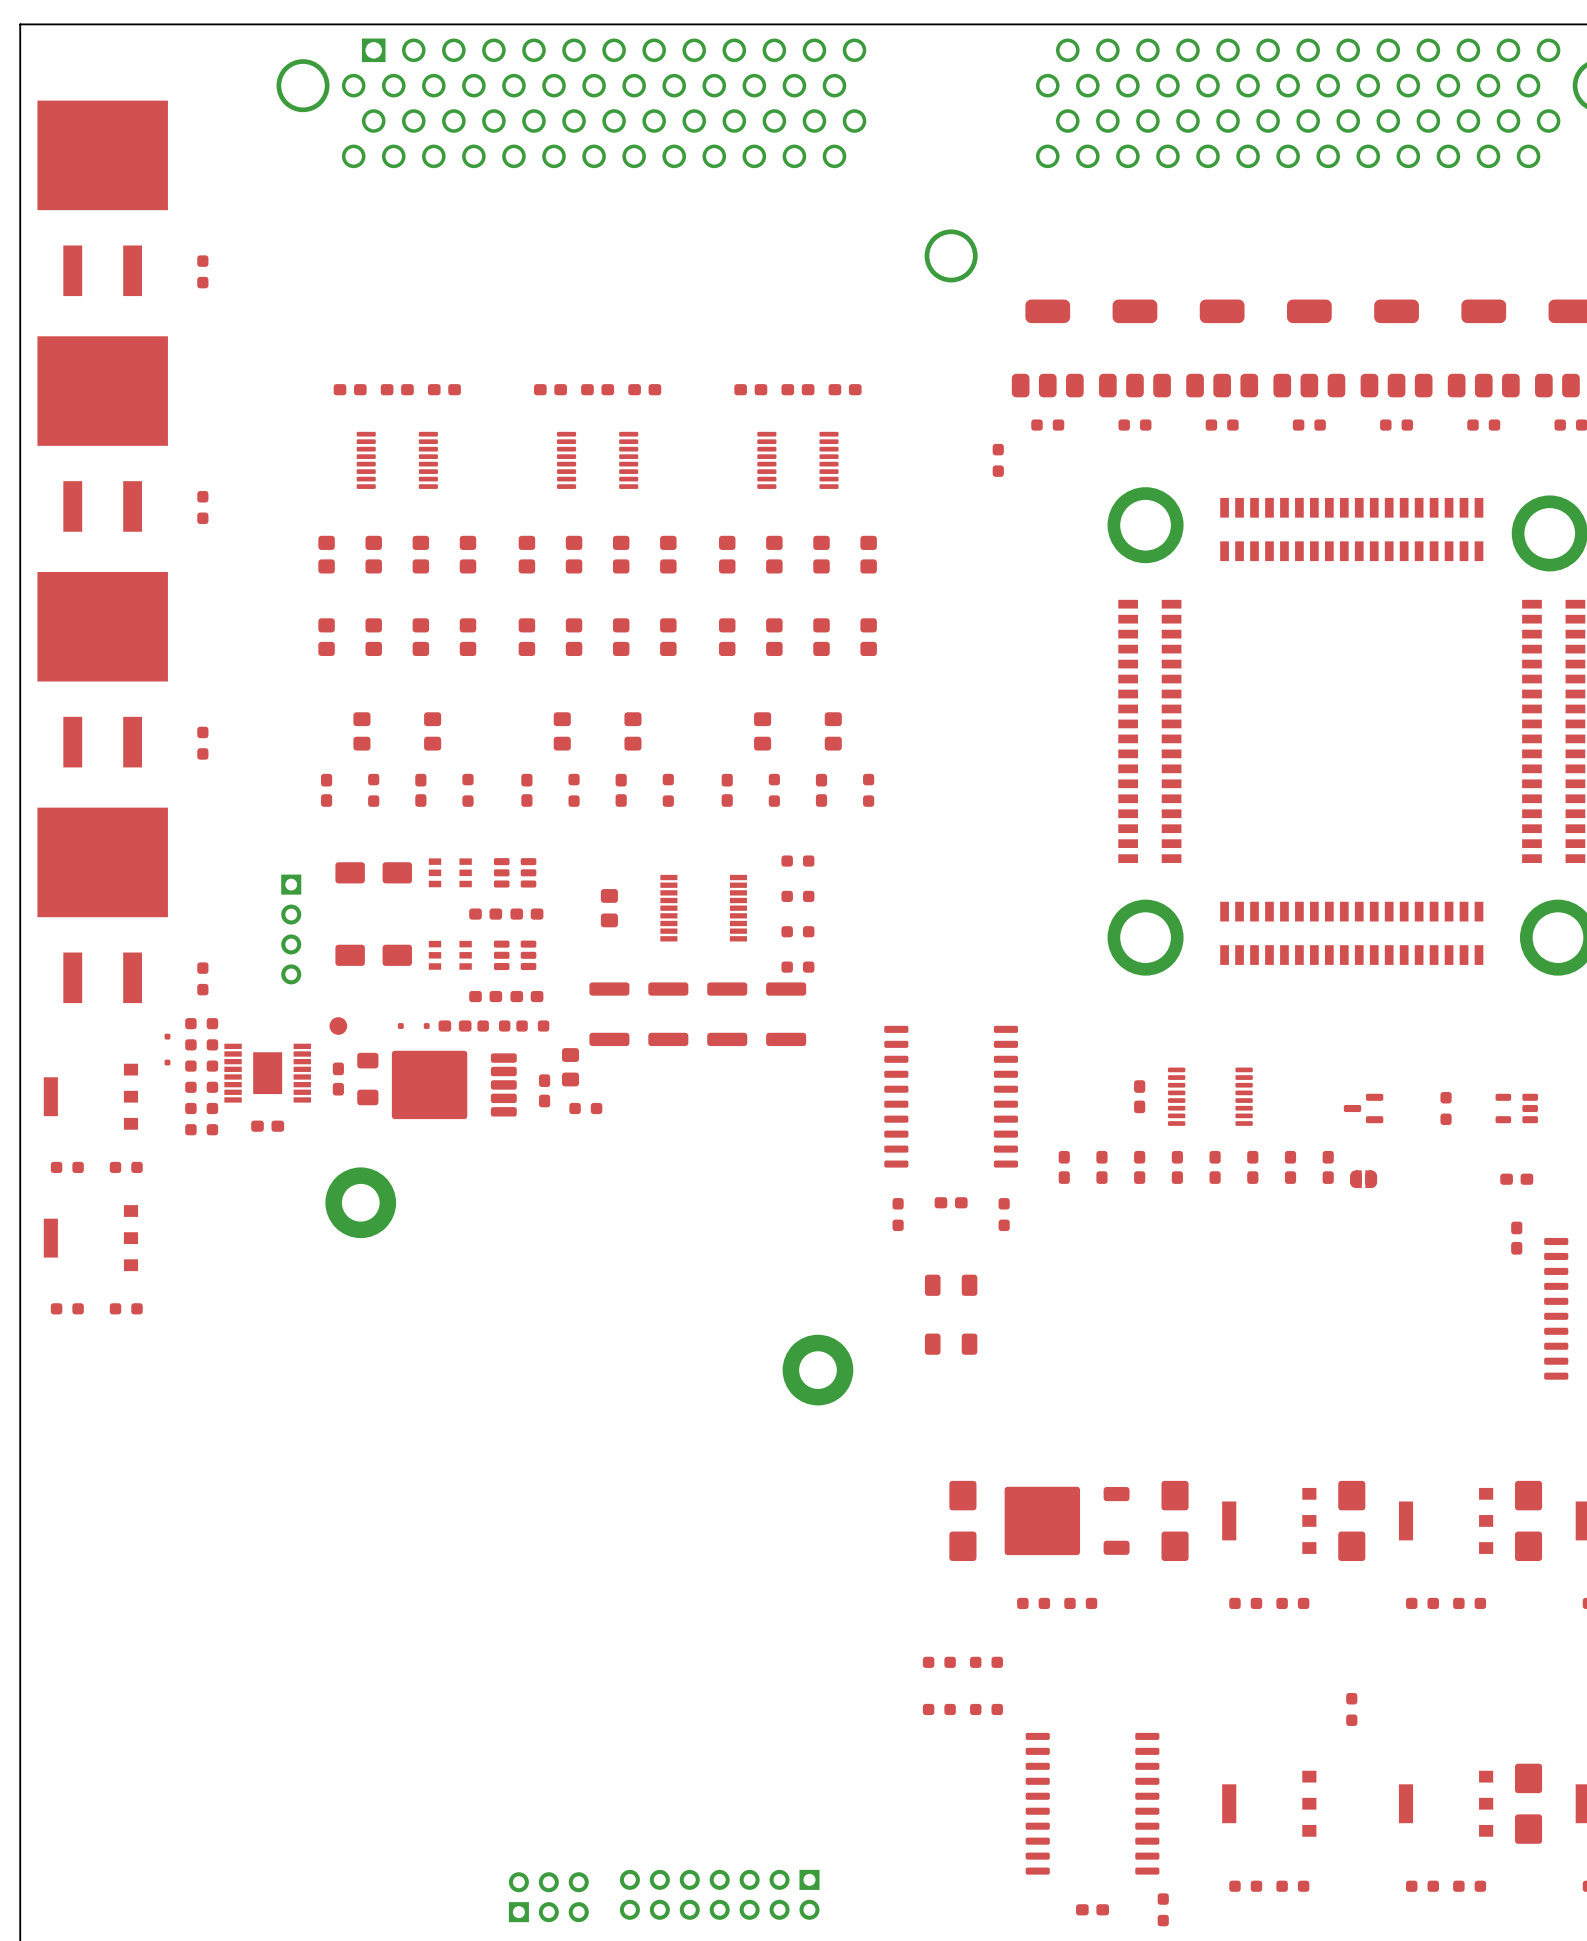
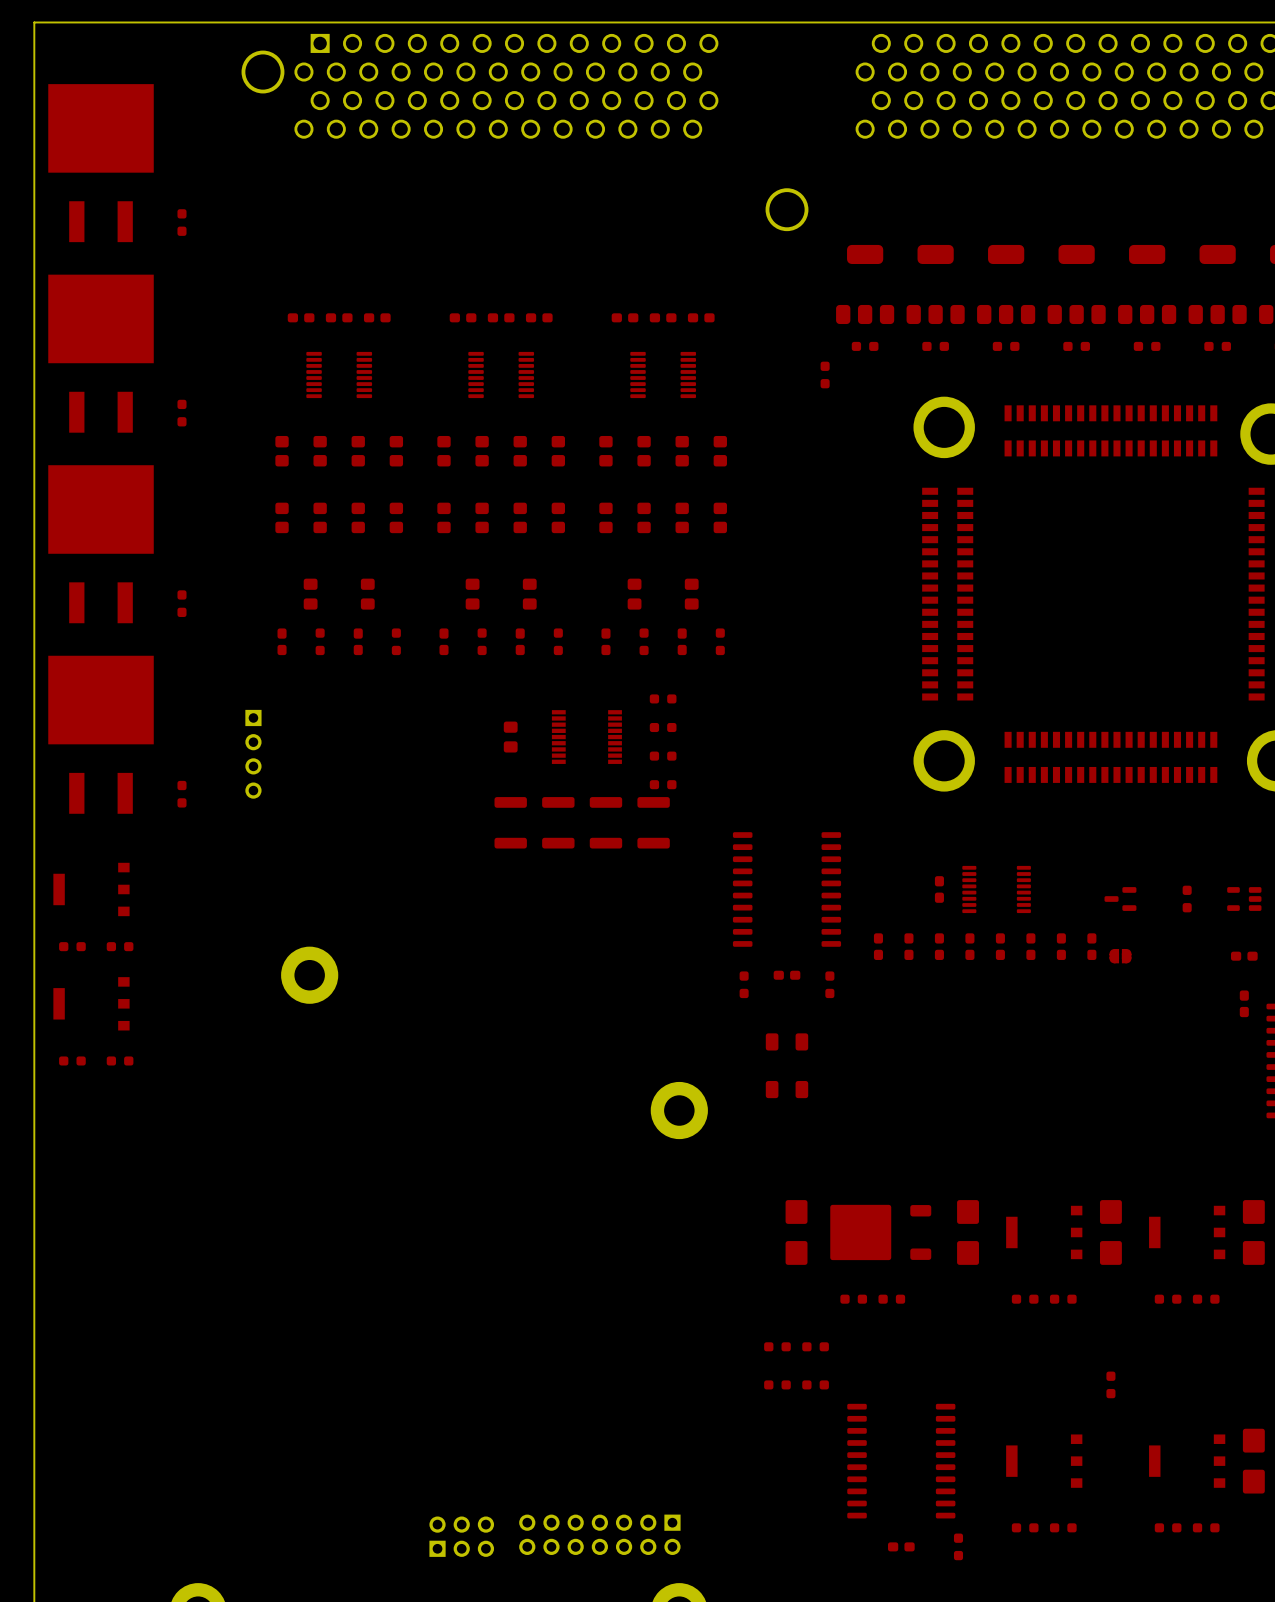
part: (373, 872) -> none
part: (450, 872) -> none
part: (515, 872) -> none
part: (485, 914) -> none
part: (526, 914) -> none
part: (373, 955) -> none
part: (450, 955) -> none
part: (515, 955) -> none
part: (485, 996) -> none
part: (526, 996) -> none
part: (201, 1023) -> none
part: (338, 1026) -> none
part: (413, 1026) -> none
part: (455, 1026) -> none
part: (493, 1026) -> none
part: (532, 1026) -> none
part: (201, 1044) -> none
part: (167, 1049) -> none
part: (201, 1066) -> none
part: (570, 1067) -> none
part: (267, 1073) -> none
part: (338, 1079) -> none
part: (367, 1079) -> none
part: (454, 1084) -> none
part: (201, 1087) -> none
part: (544, 1090) -> none
part: (201, 1108) -> none
part: (585, 1108) -> none
part: (267, 1126) -> none
part: (201, 1129) -> none

